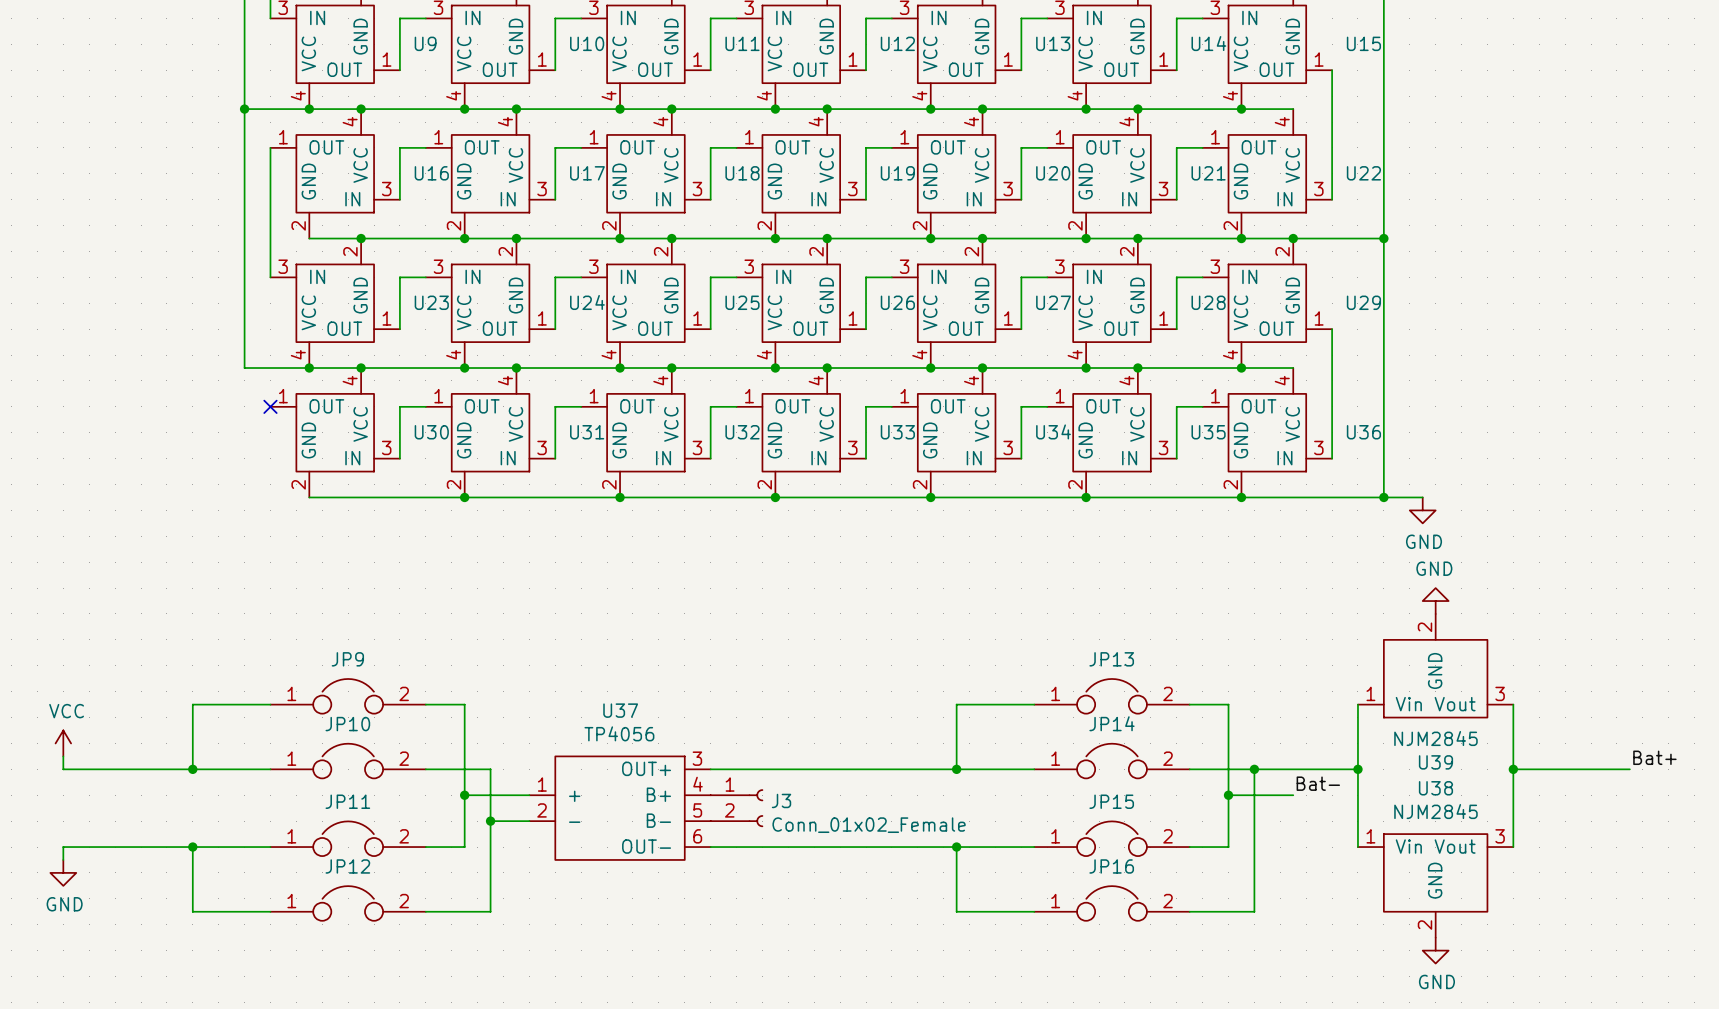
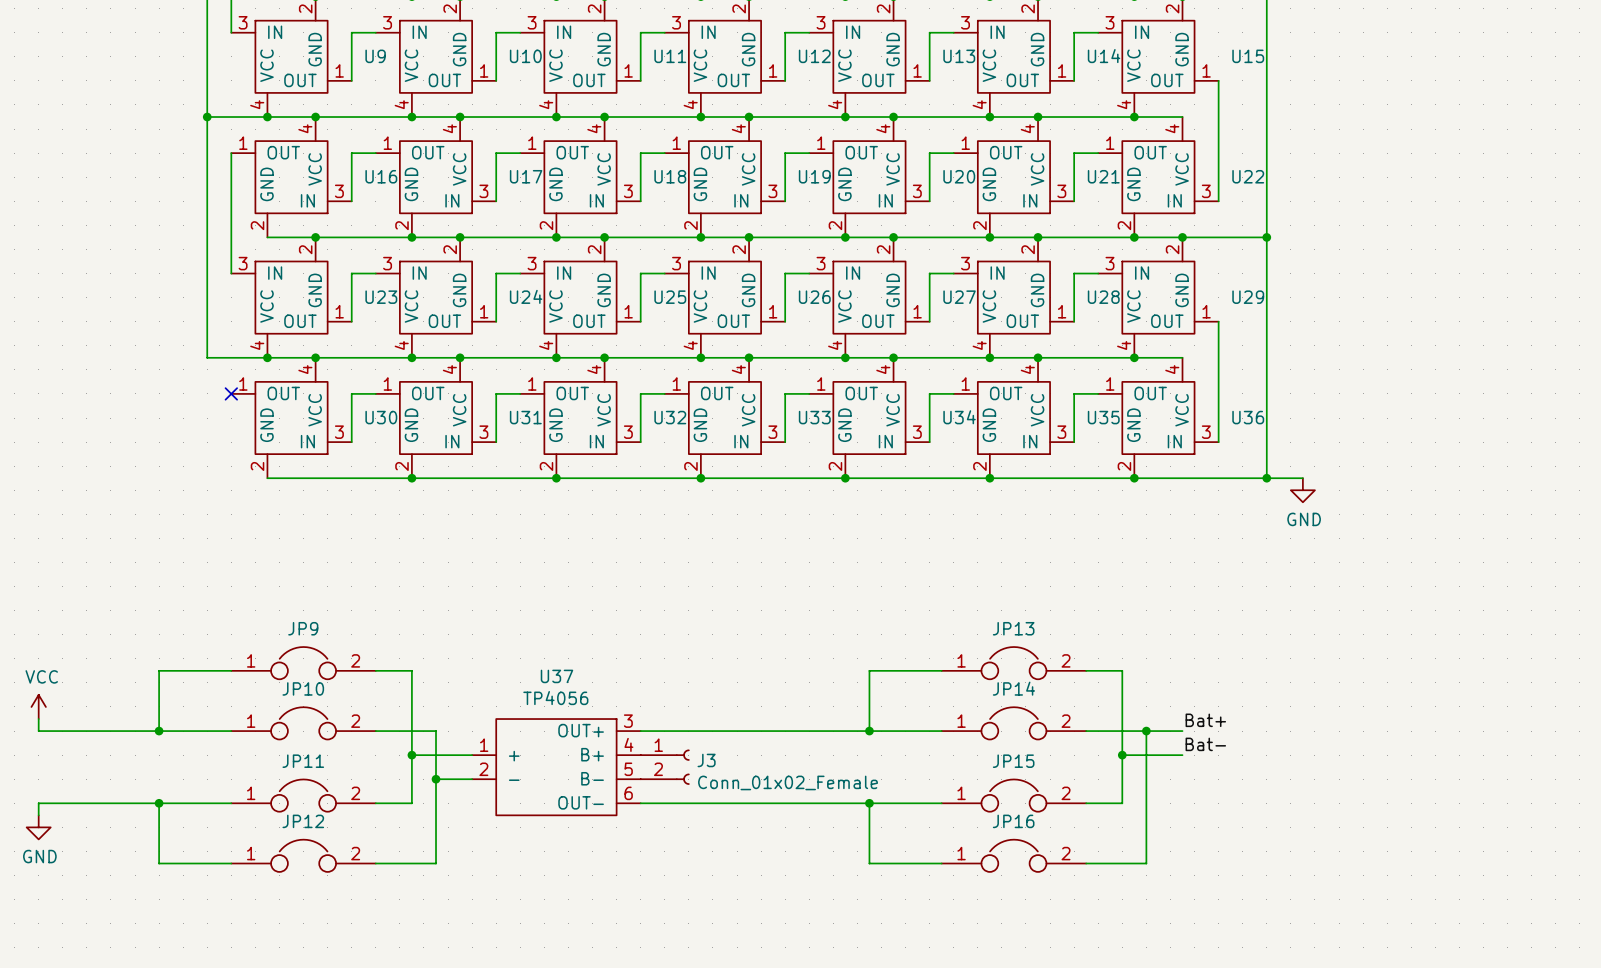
power symbol: GND (1435, 601) -> none
U39: NJM2845 (1435, 665) -> none
wire: (1357, 704) (1357, 847) -> none
wire: (1513, 704) (1513, 847) -> none
label: none -> Bat+ (1205, 720)
label: Bat+ (1654, 757) -> none
wire: (1293, 769) (1357, 769) -> none
junction: (1357, 769) -> none
wire: (1513, 769) (1629, 769) -> none
junction: (1513, 769) -> none
U38: NJM2845 (1435, 885) -> none
power symbol: GND (1435, 950) -> none

